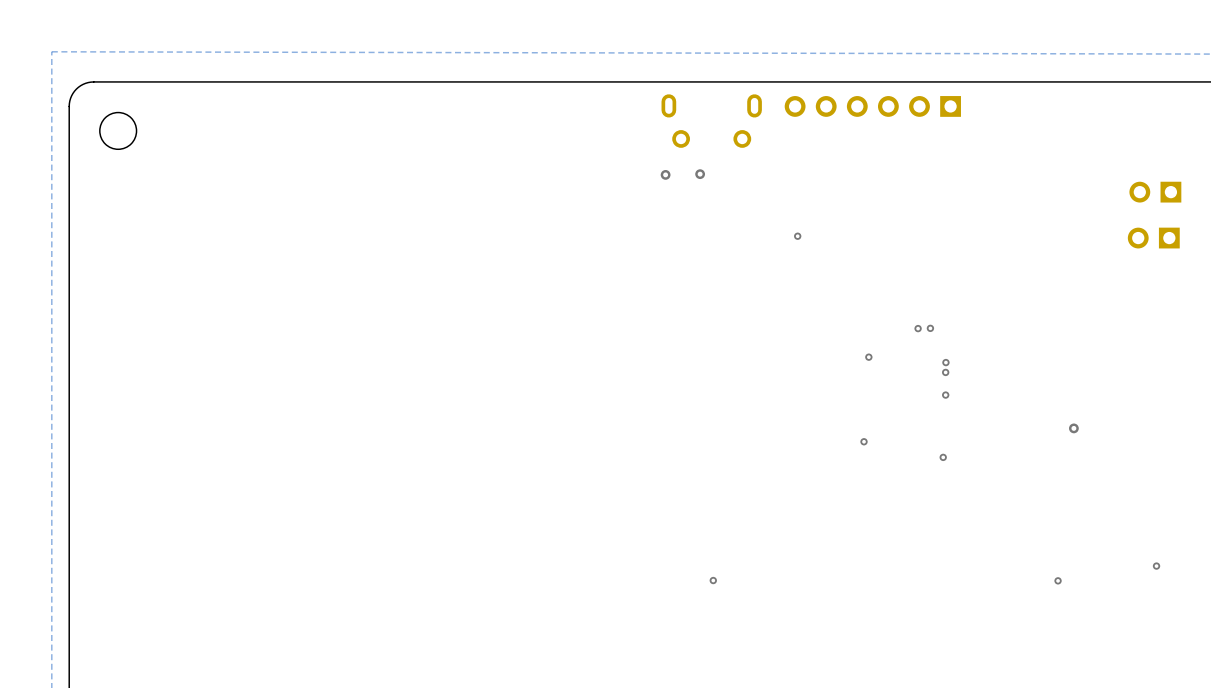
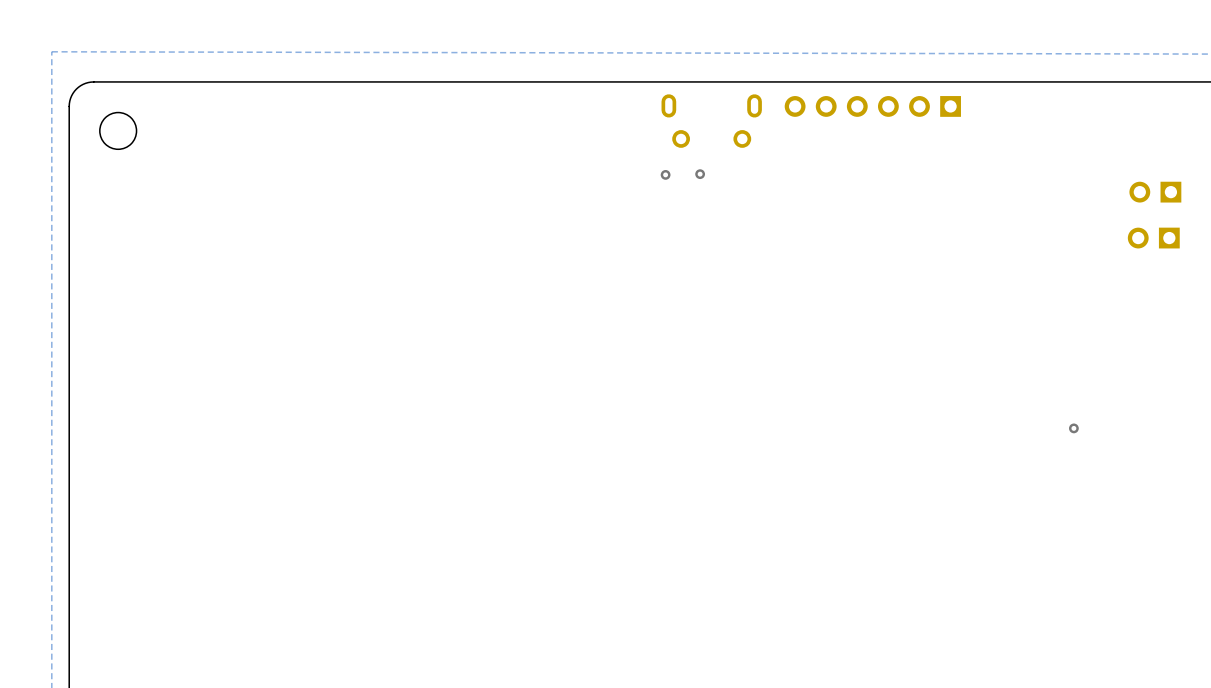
via: (797, 236) -> none
via: (918, 328) -> none
via: (930, 328) -> none
via: (868, 357) -> none
via: (945, 362) -> none
via: (945, 372) -> none
via: (945, 395) -> none
via: (864, 441) -> none
via: (943, 457) -> none
via: (1156, 566) -> none
via: (713, 580) -> none
via: (1058, 580) -> none

